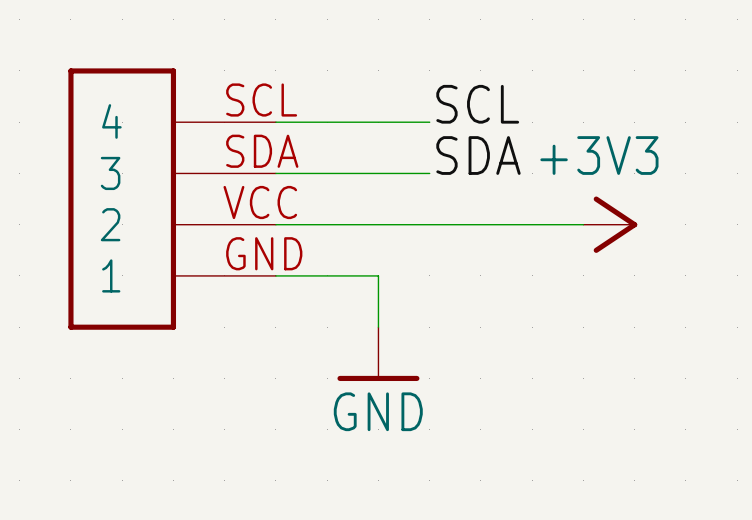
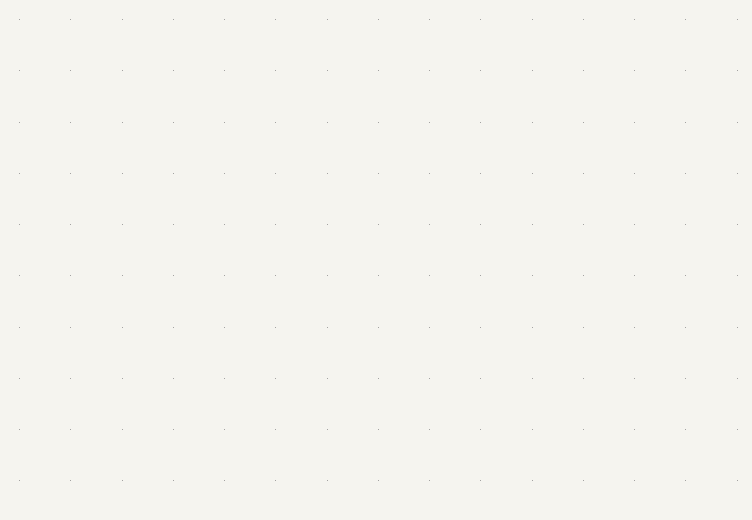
label: SCL (477, 104) -> none
wire: (275, 122) (429, 122) -> none
label: SDA (478, 155) -> none
wire: (275, 173) (429, 173) -> none
part: (172, 199) -> none
wire: (275, 224) (583, 224) -> none
power symbol: +3V3 (610, 224) -> none
wire: (275, 275) (378, 275) (378, 327) -> none
power symbol: GND (378, 354) -> none

